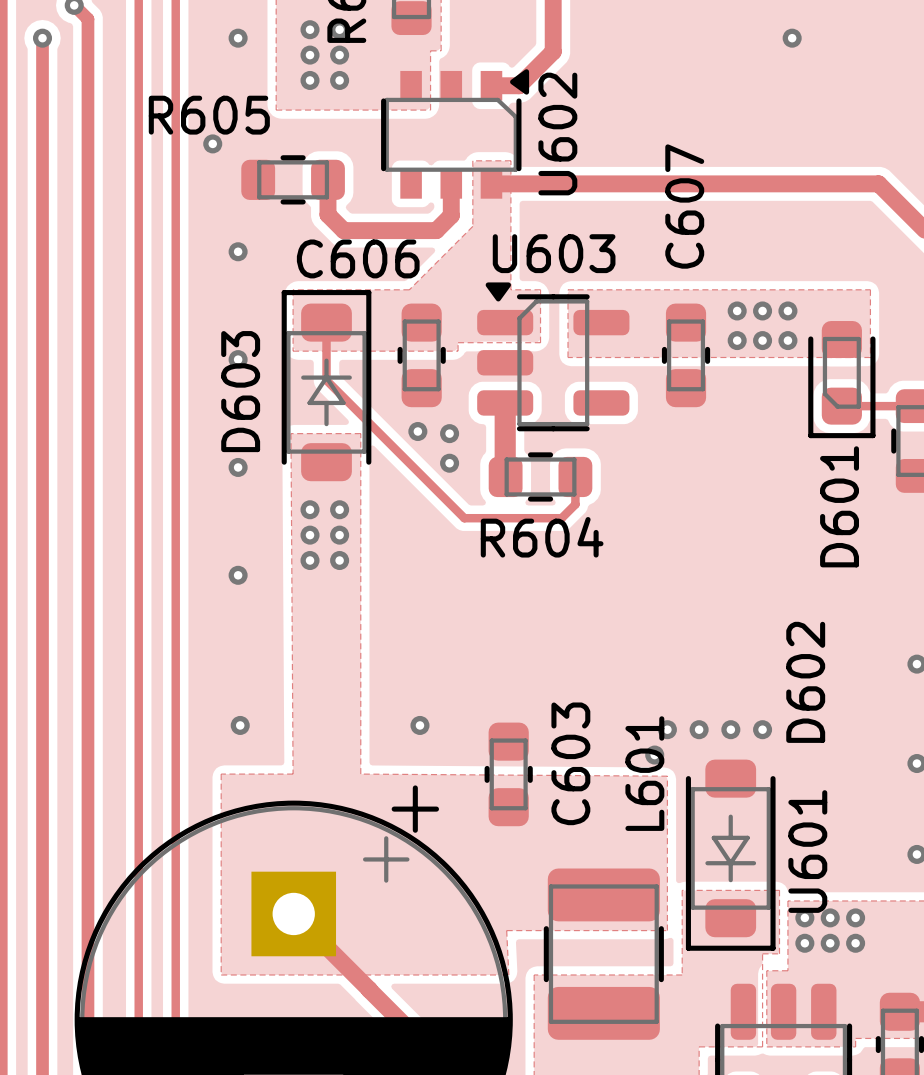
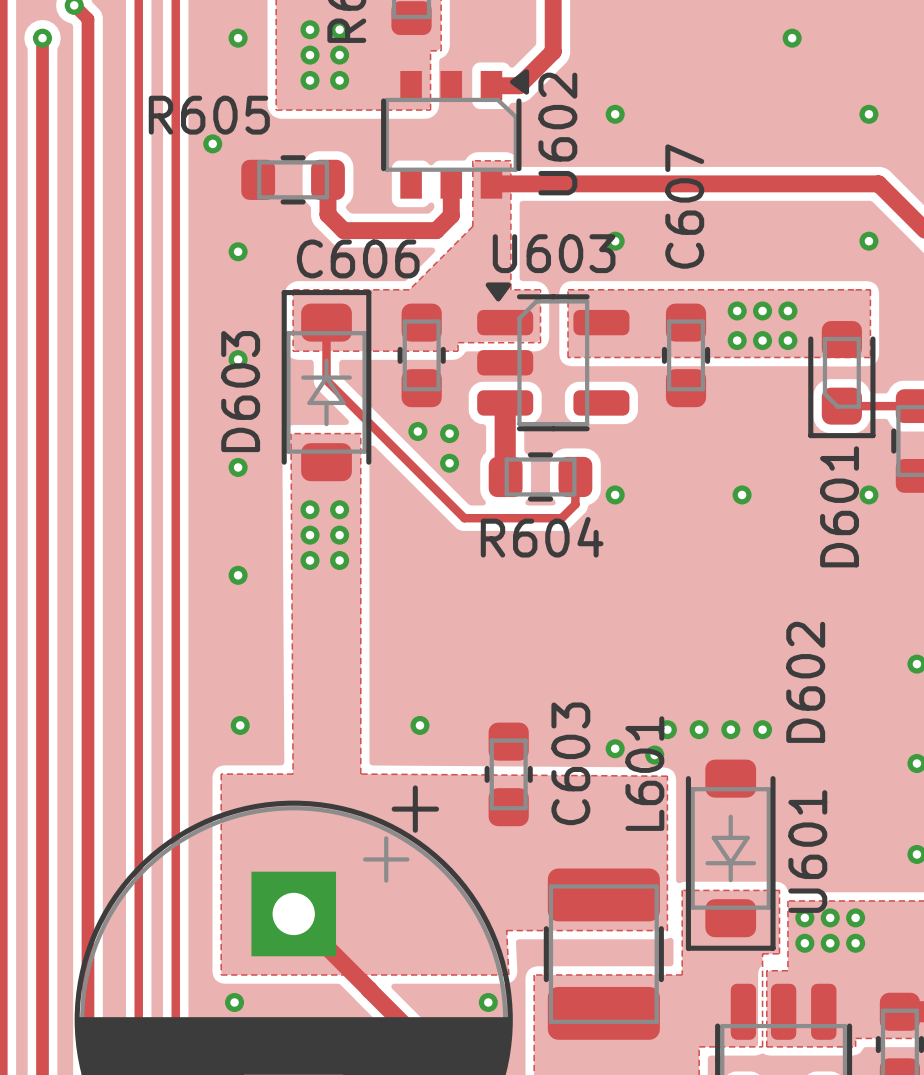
via: none -> (615, 114)
via: none -> (868, 114)
via: none -> (615, 241)
via: none -> (868, 241)
via: none -> (615, 494)
via: none -> (742, 494)
via: none -> (868, 494)
via: none -> (615, 748)
via: none -> (234, 1002)
via: none -> (488, 1002)

